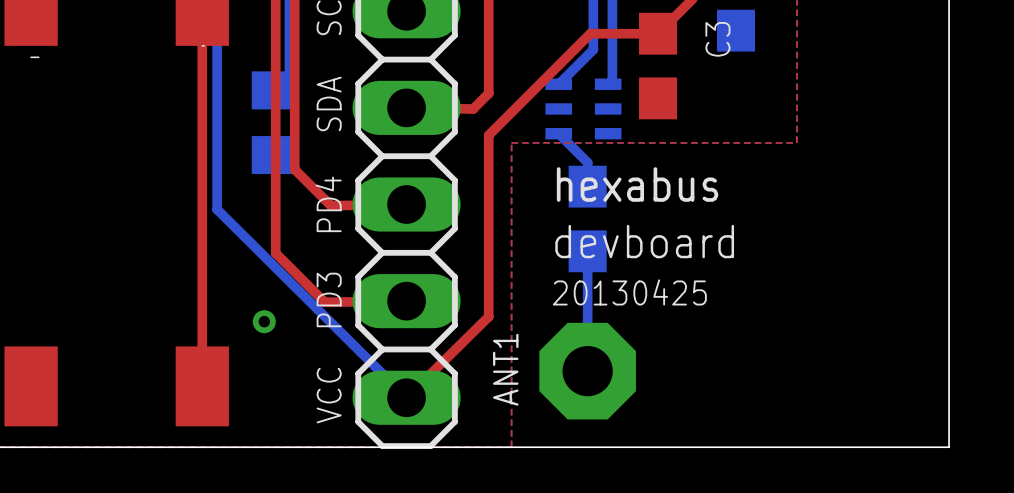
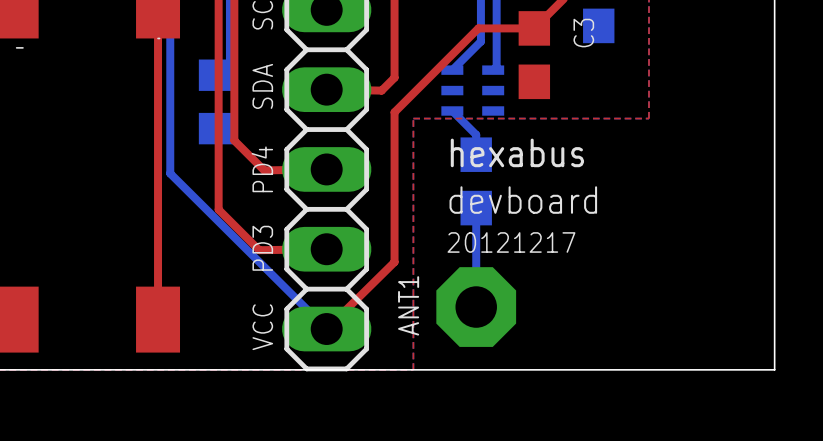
text: 20130425 (629, 292) -> 20121217 (511, 242)
via: (264, 321) -> none

